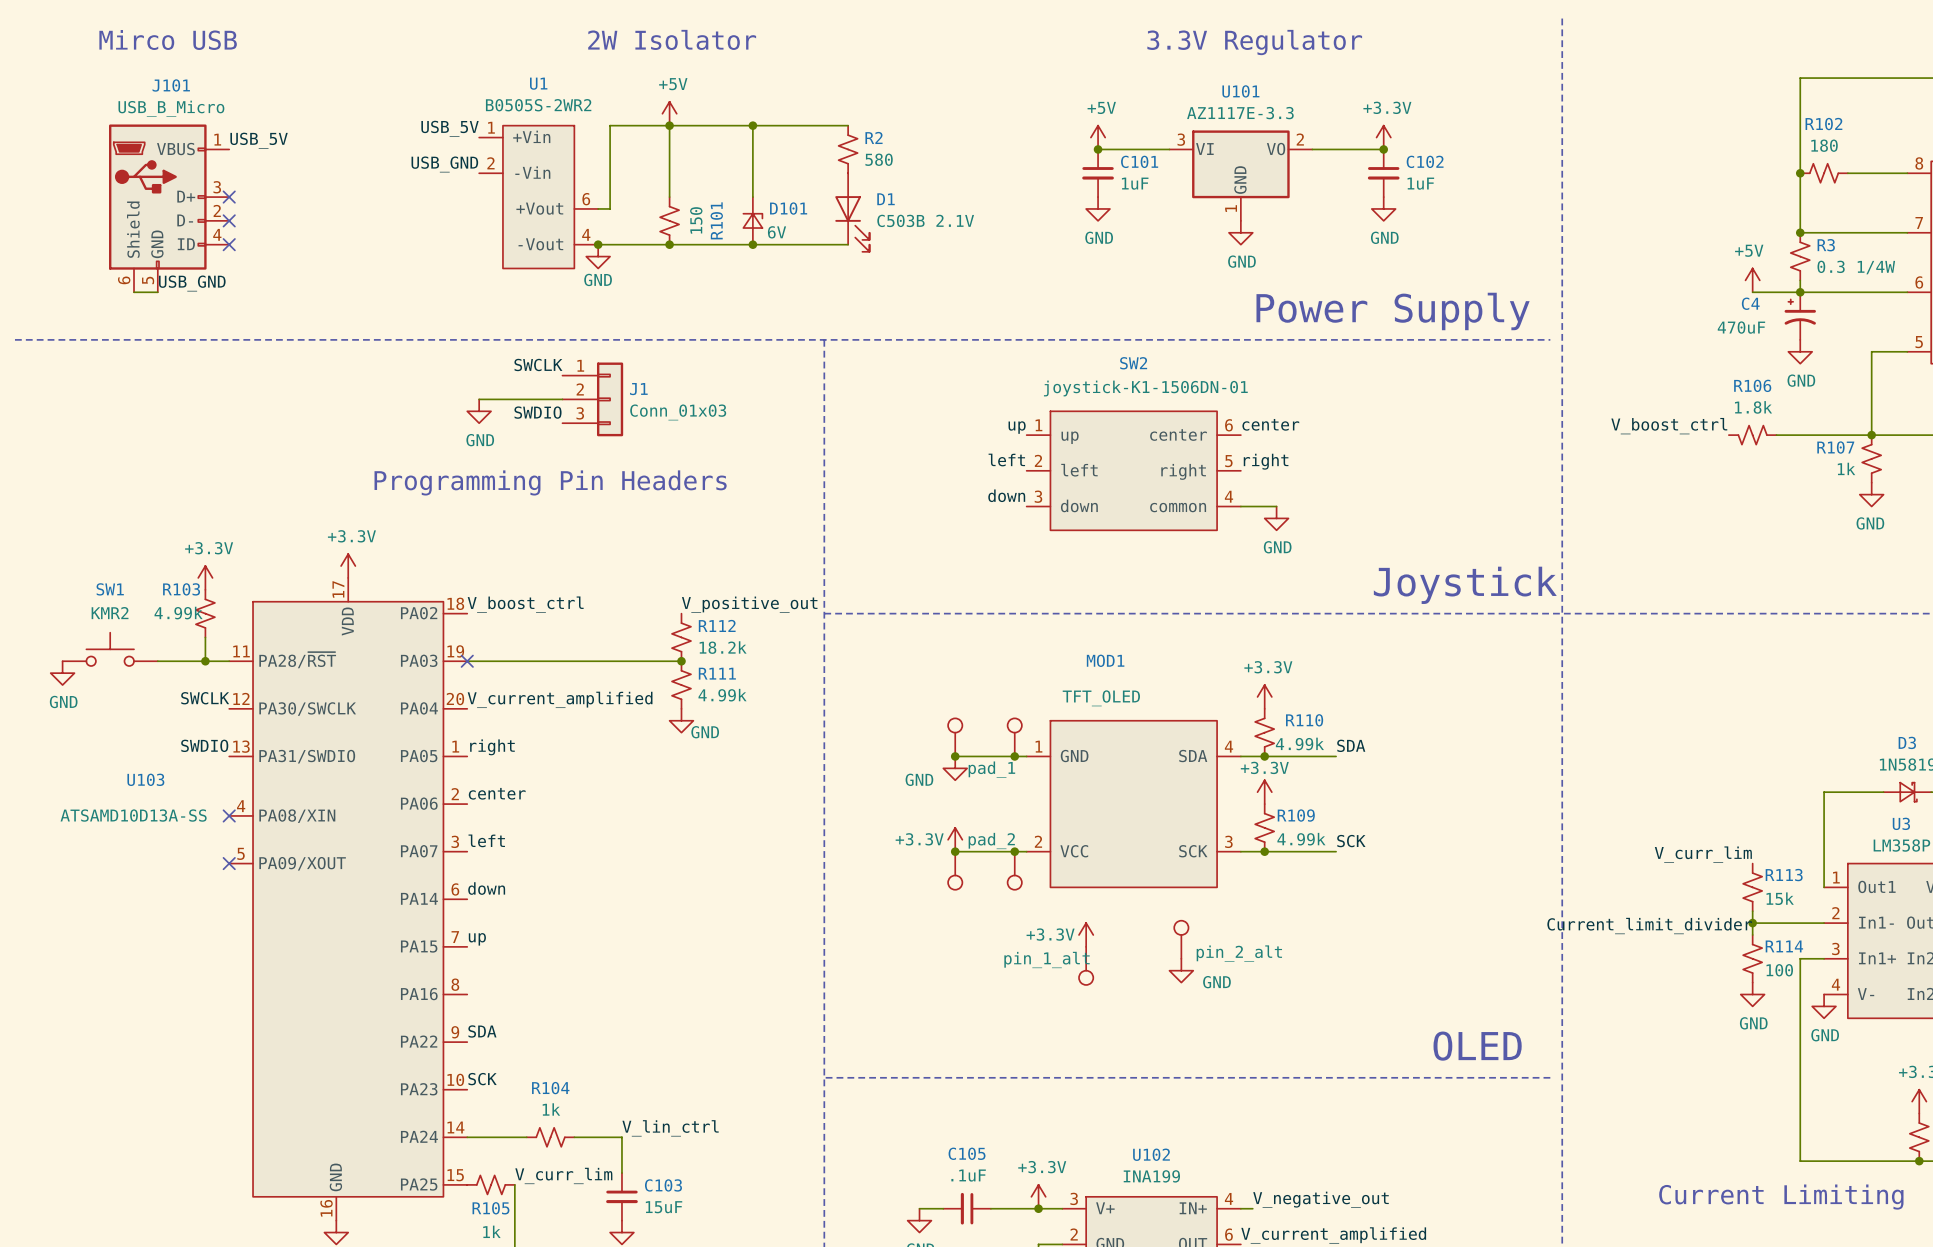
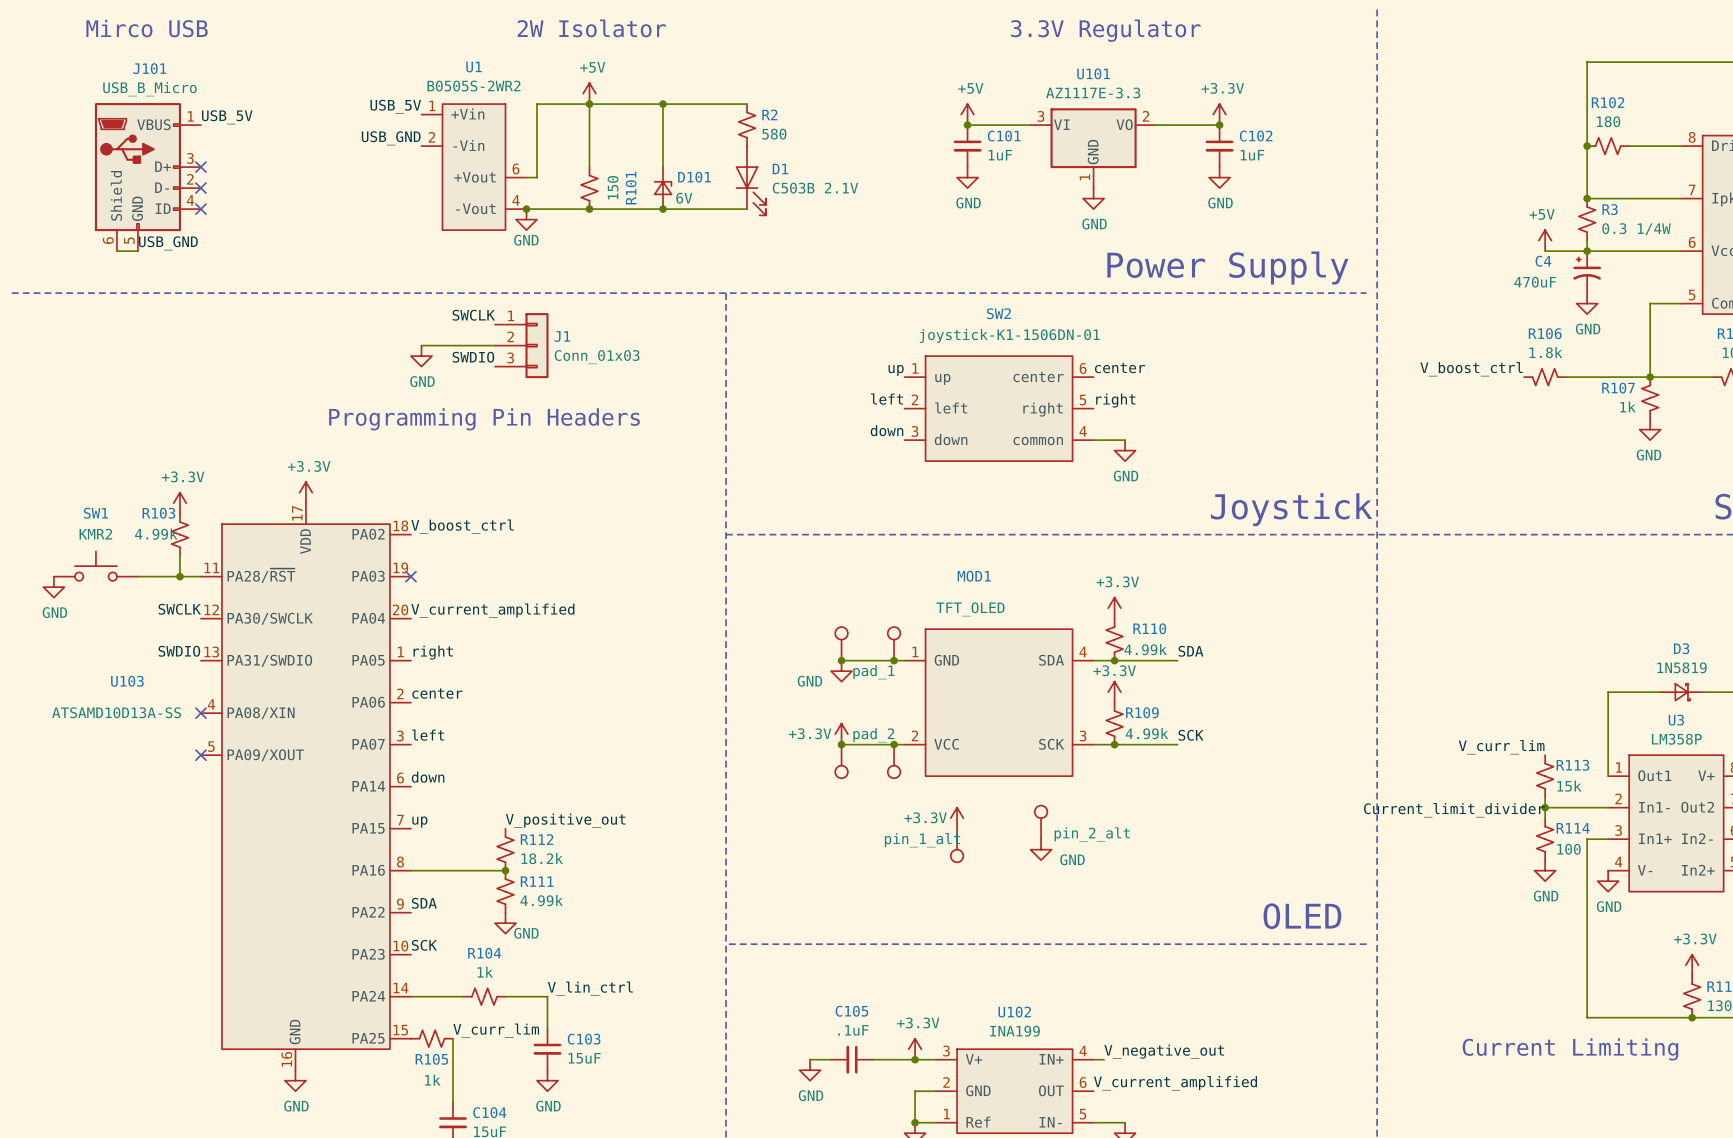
label: V_positive_out (749, 604) -> none
R112 position: (681, 637) -> (505, 849)
wire: (467, 661) (681, 661) -> none
junction: (681, 661) -> none
R111 position: (681, 685) -> (505, 891)
power symbol: GND (681, 720) -> none
label: none -> V_positive_out (565, 820)
wire: none -> (410, 870) (505, 870)
junction: none -> (505, 870)
power symbol: none -> GND (505, 923)

